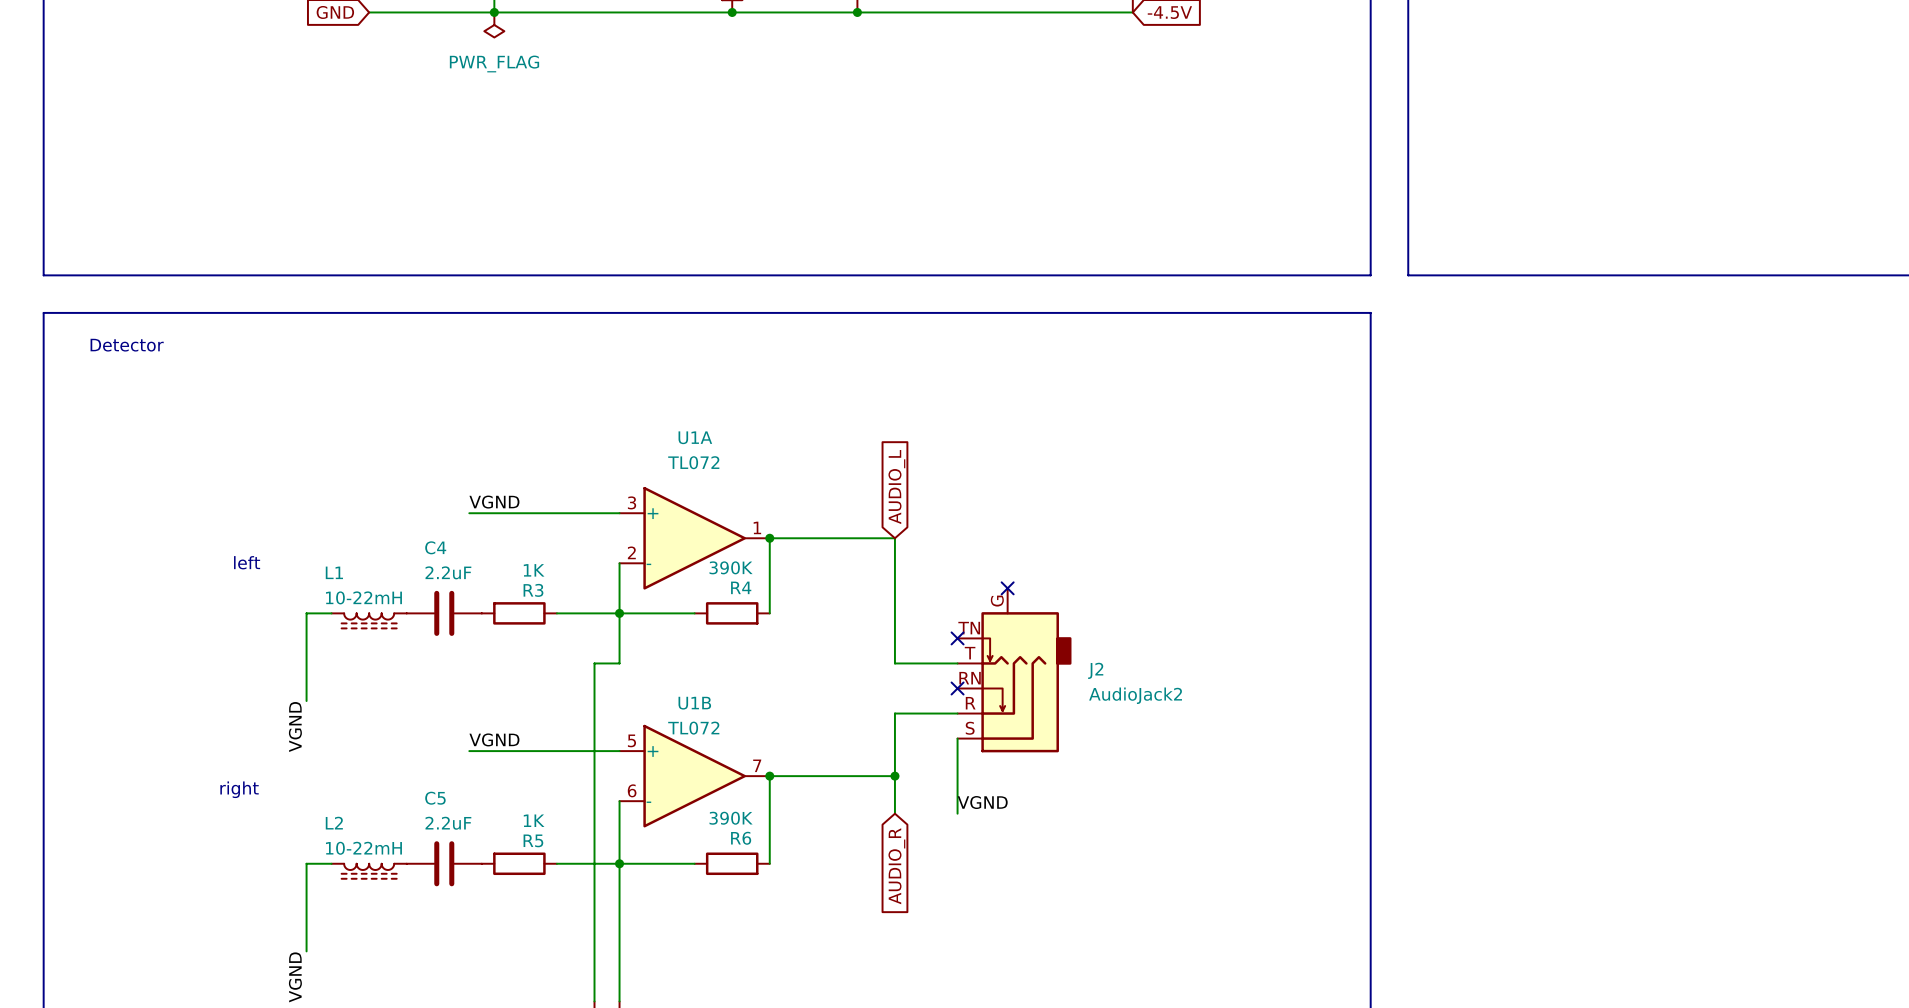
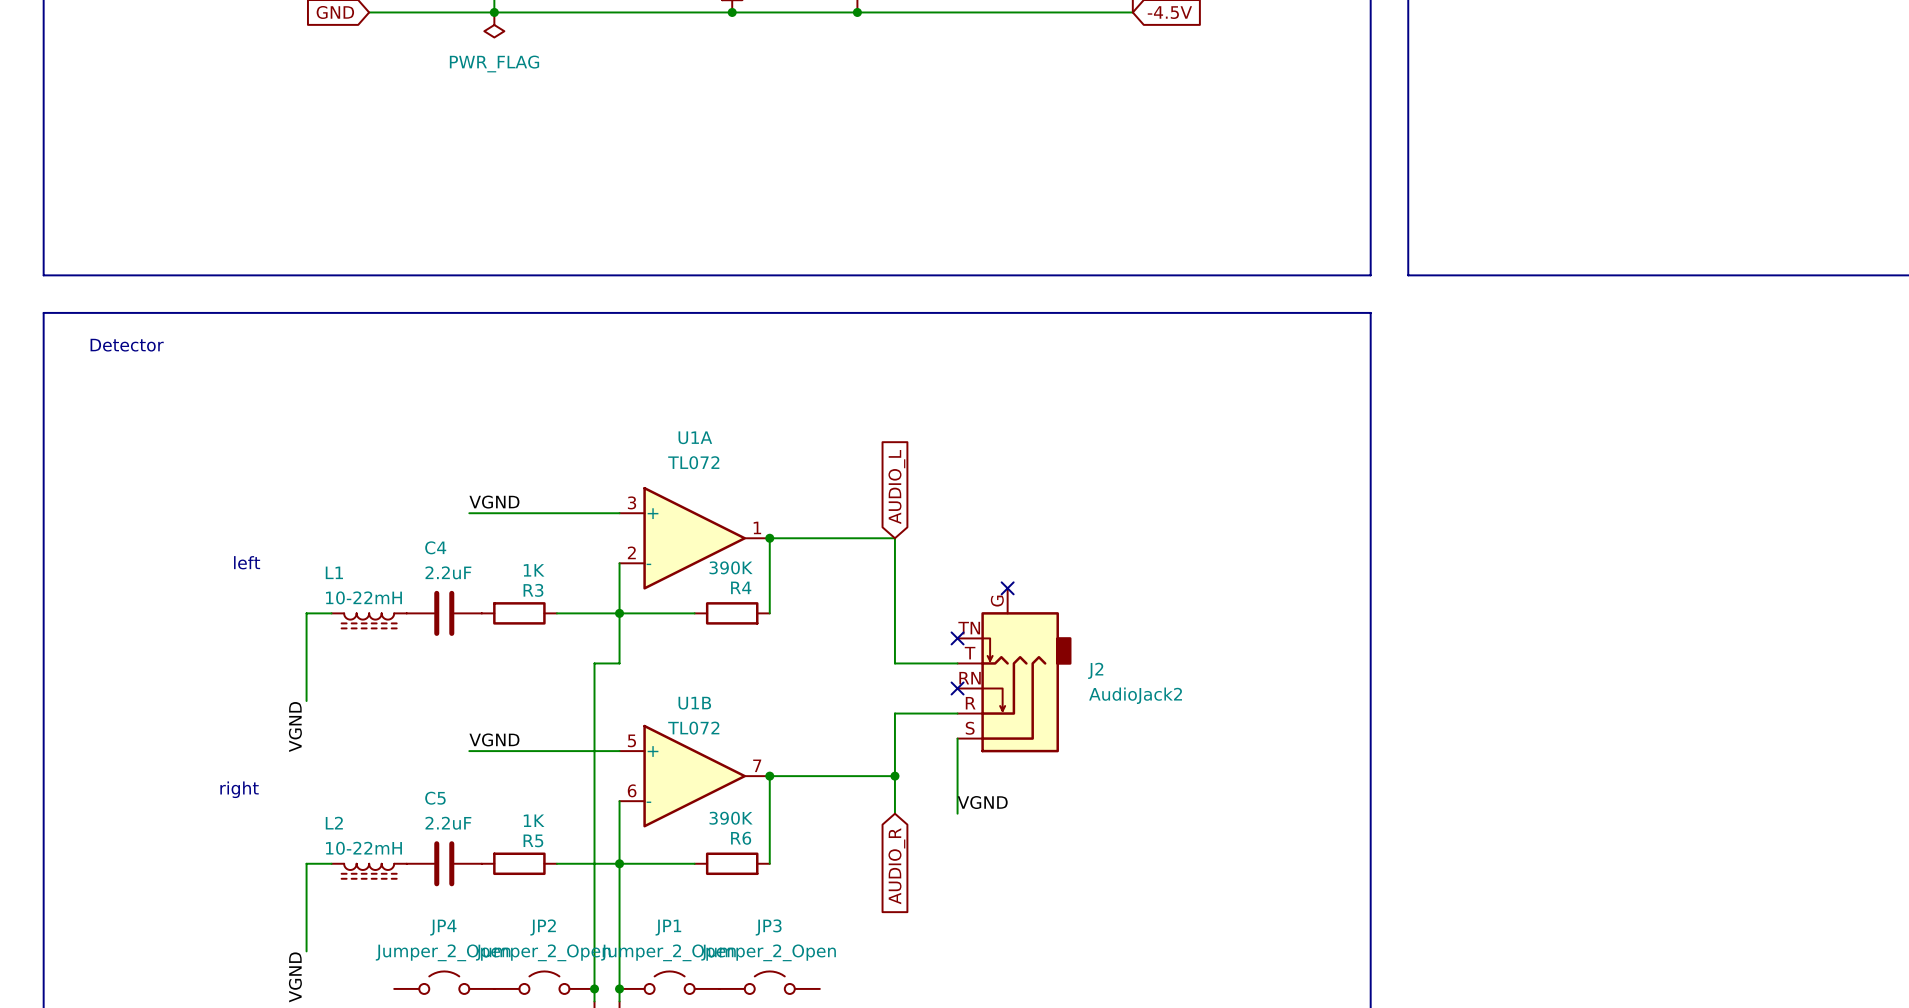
JP4: none -> Jumper_2_Open (444, 982)
JP2: none -> Jumper_2_Open (544, 982)
JP1: none -> Jumper_2_Open (669, 982)
JP3: none -> Jumper_2_Open (769, 982)
junction: none -> (594, 988)
junction: none -> (619, 988)

